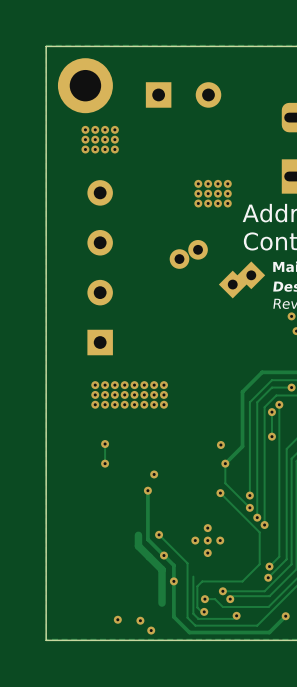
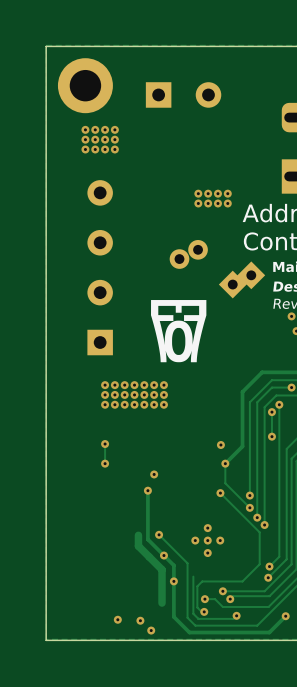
via: (198, 183) -> none
via: (208, 183) -> none
via: (217, 183) -> none
via: (227, 183) -> none
drawing: none -> [151, 300, 207, 363]
via: (95, 385) -> none
via: (95, 394) -> none
via: (95, 404) -> none

